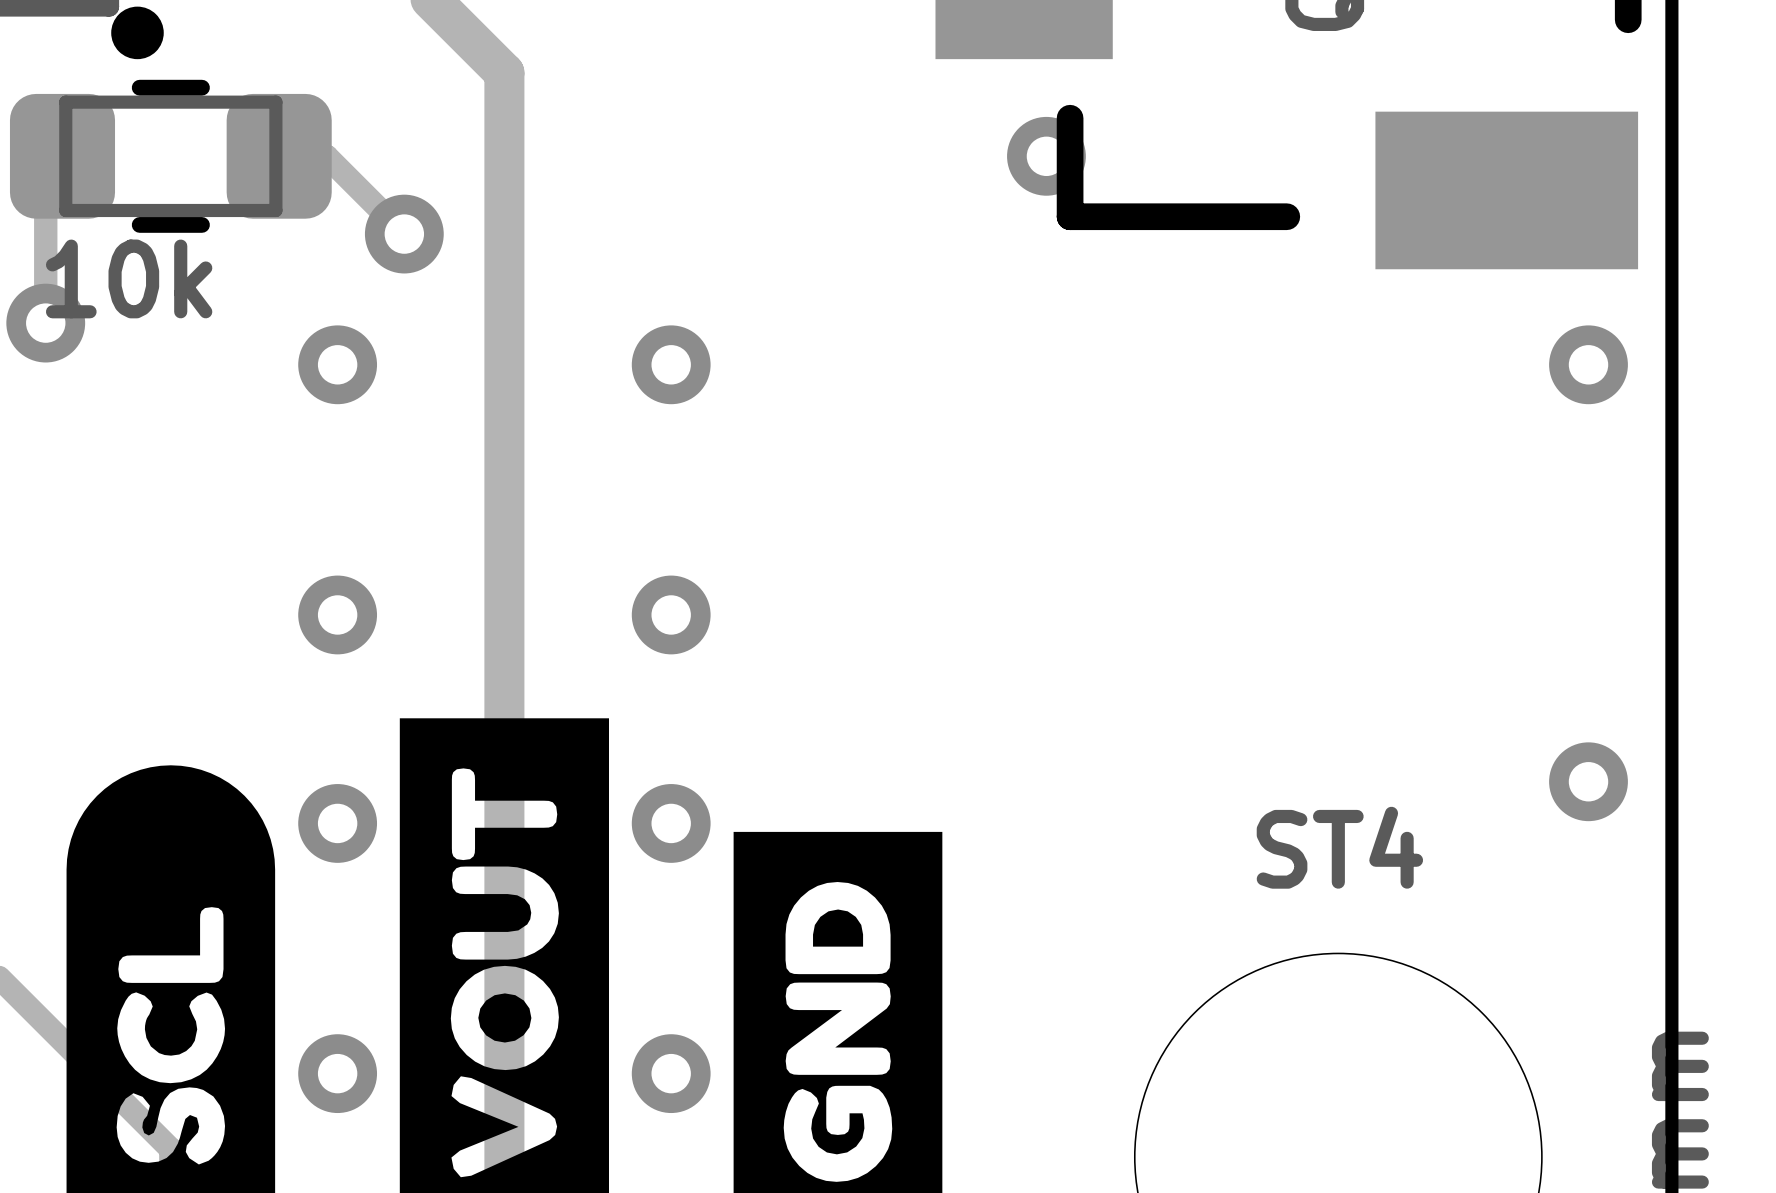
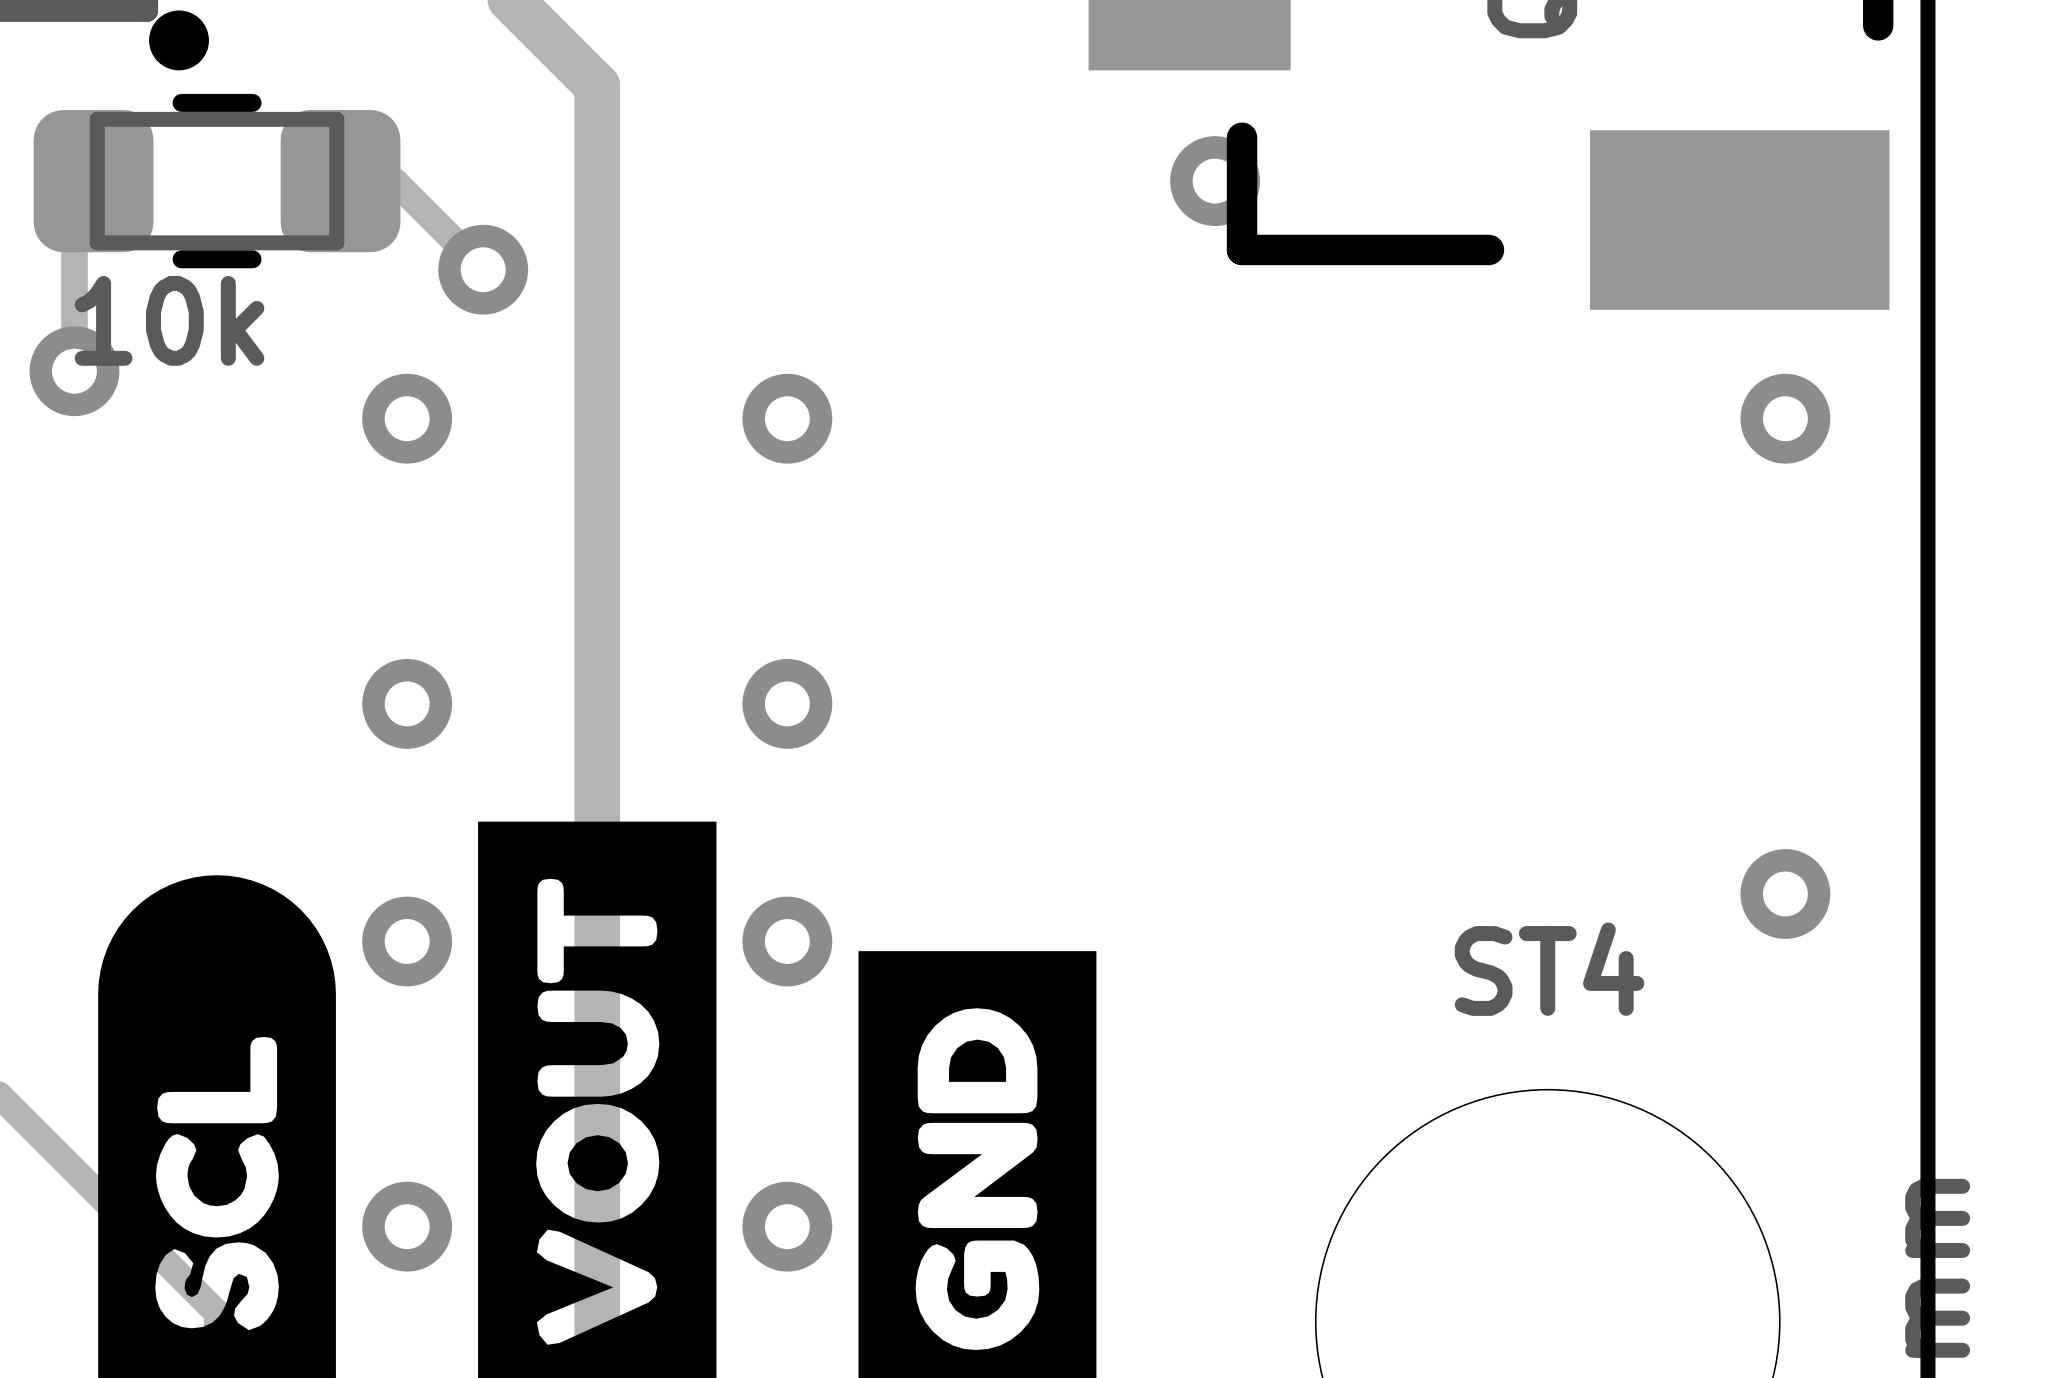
via position: (1588, 364) -> (1785, 418)
via position: (1588, 781) -> (1785, 893)

